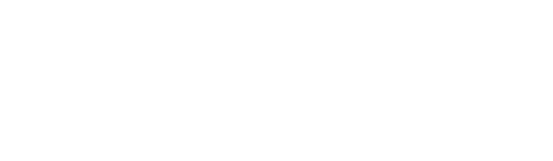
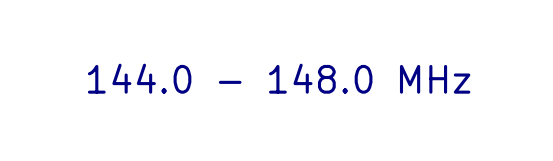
text: none -> 144.0 - 148.0 MHz (279, 78)

